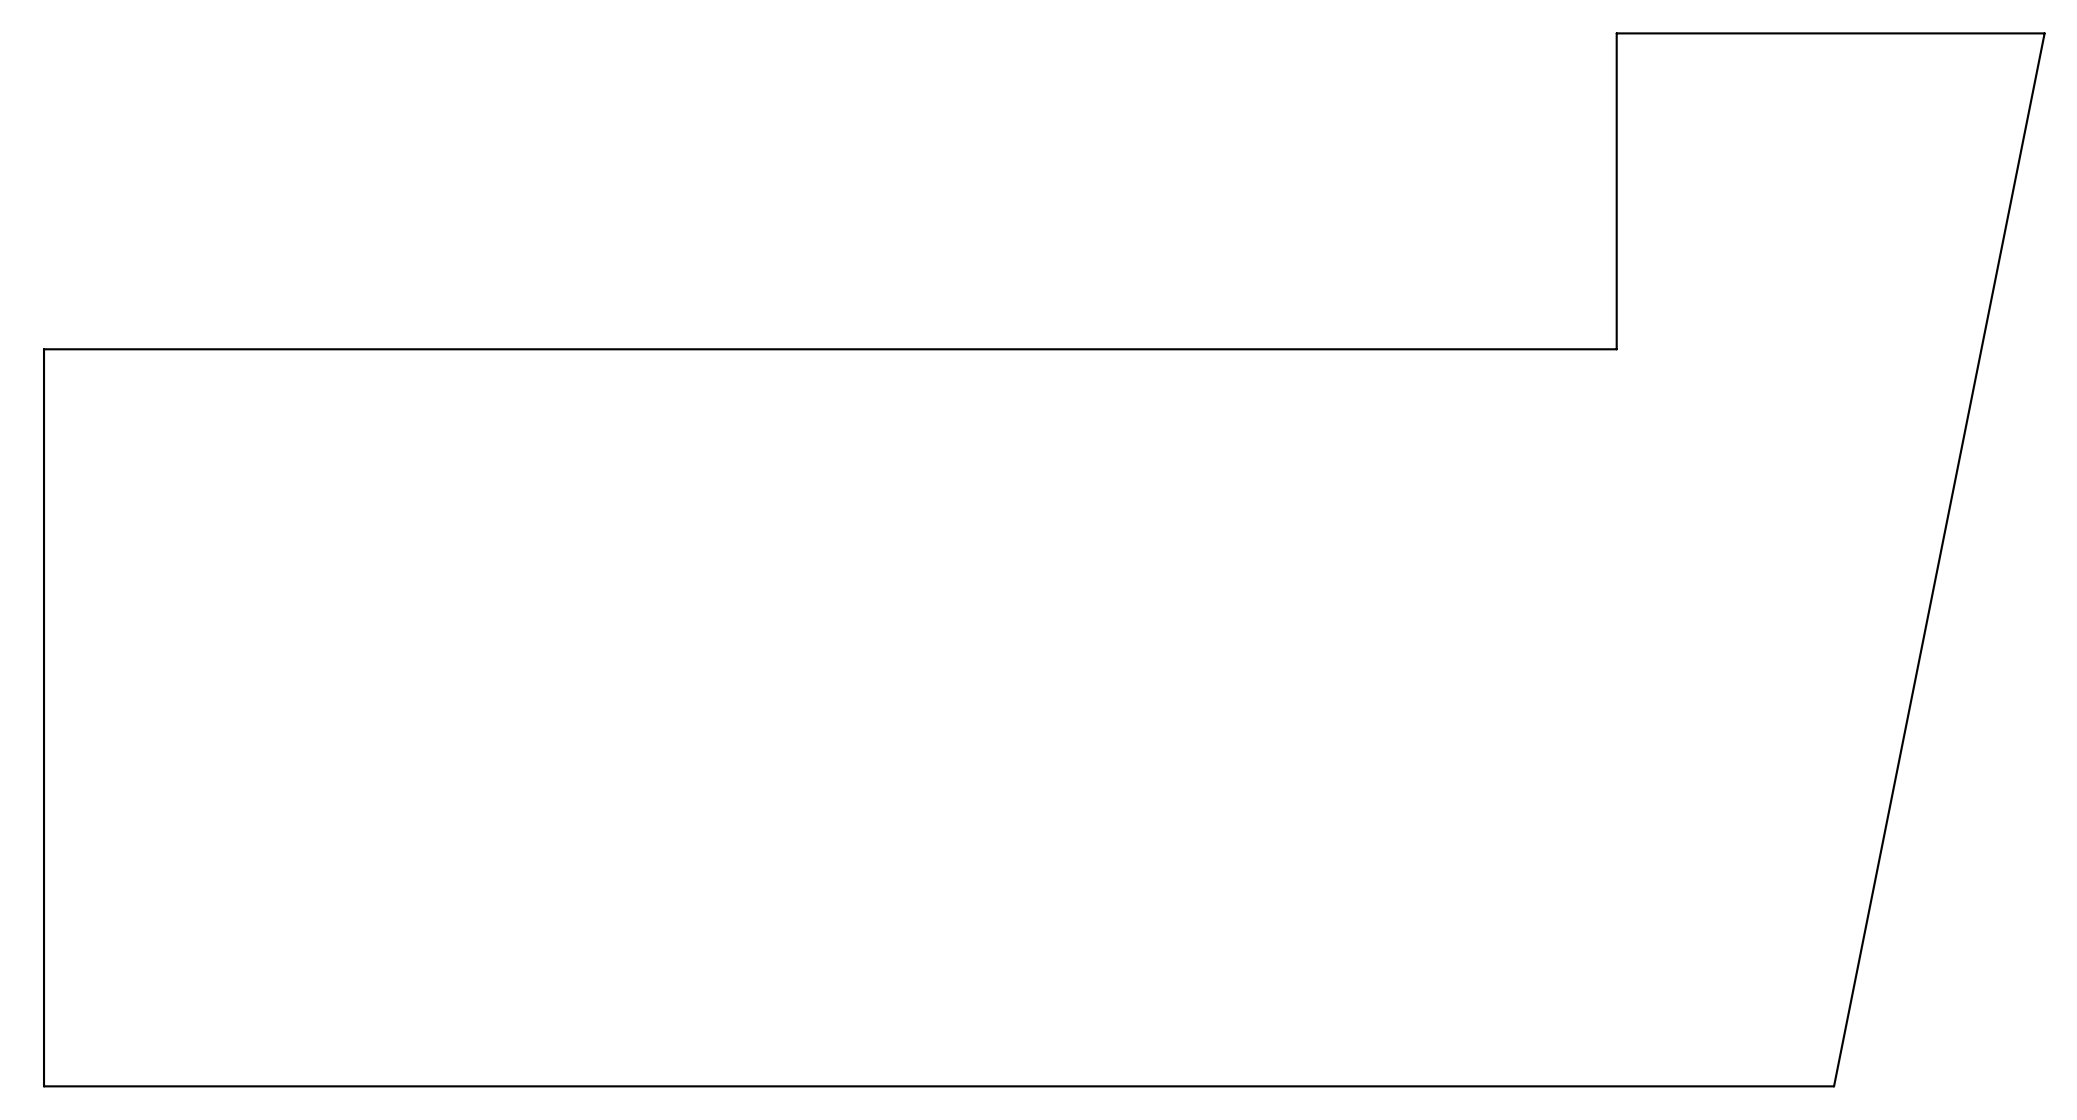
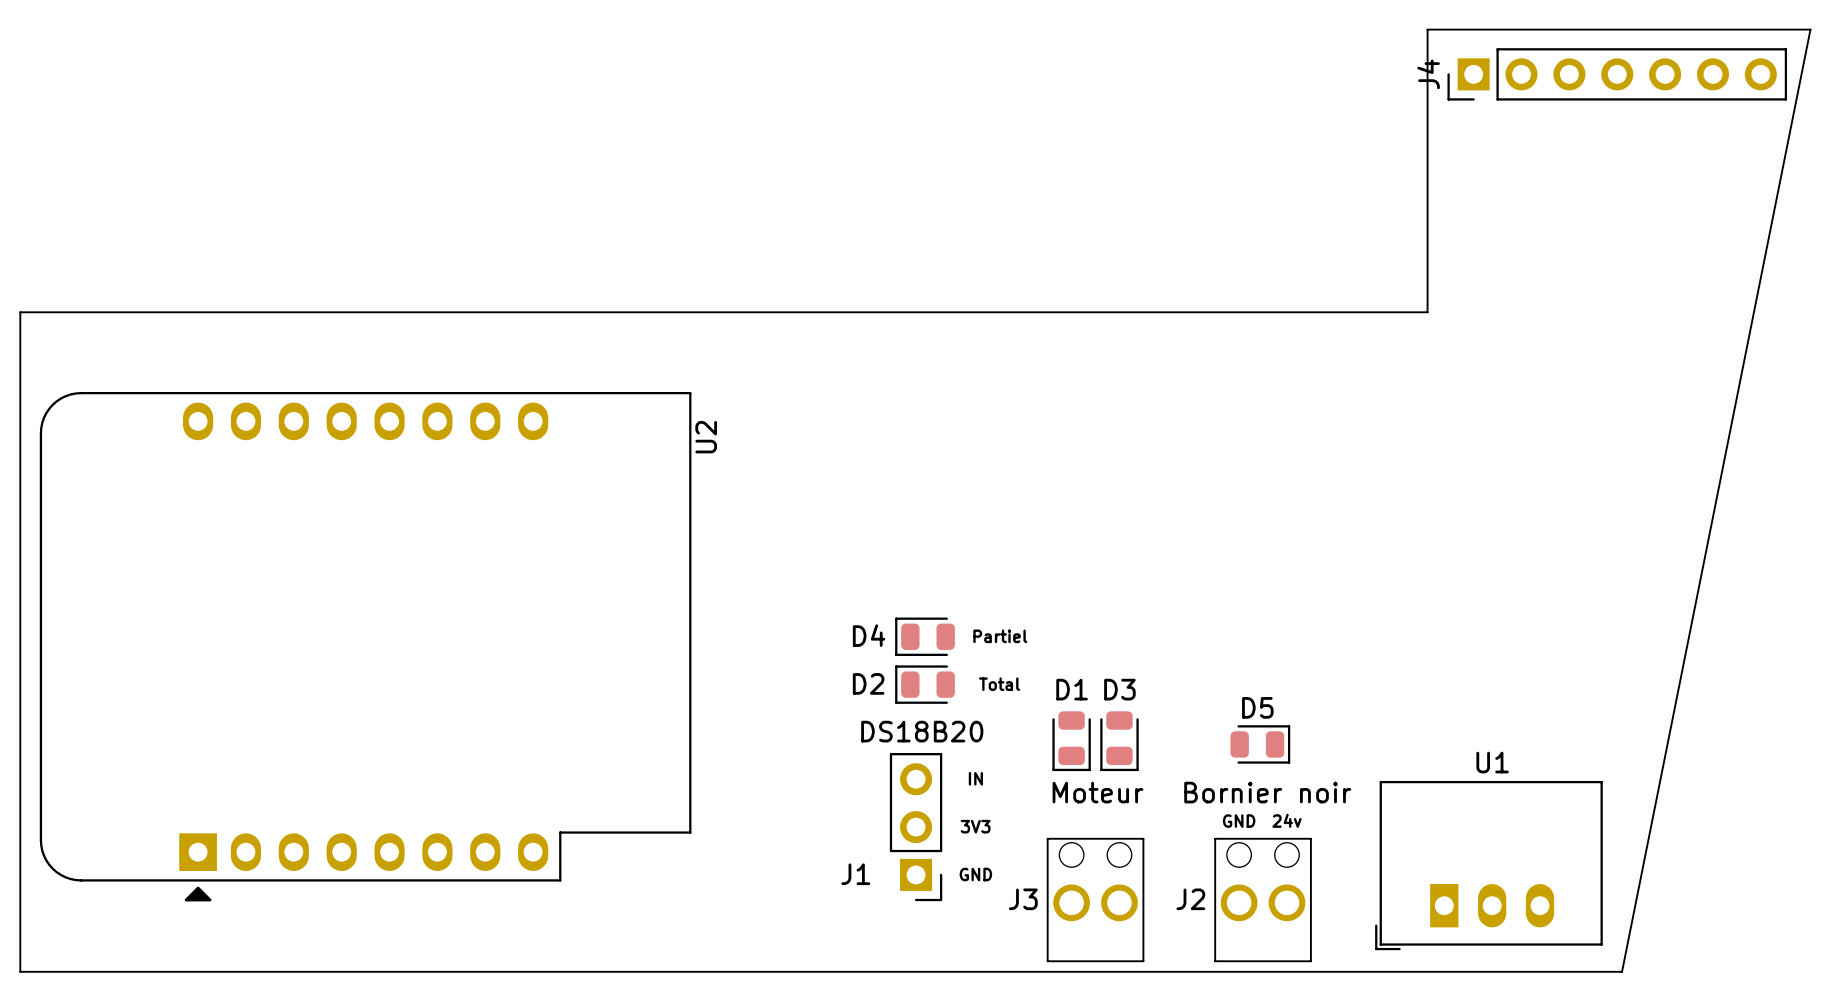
J4: none -> (1617, 74)
D4: none -> (925, 636)
text: none -> Partiel (1000, 636)
U2: none -> (365, 646)
text: none -> Total (999, 684)
D2: none -> (925, 684)
text: none -> DS18B20 (922, 731)
D1: none -> (1071, 741)
D3: none -> (1119, 741)
D5: none -> (1260, 744)
text: none -> IN (975, 778)
text: none -> Moteur (1097, 792)
text: none -> Bornier noir (1267, 792)
text: none -> GND (1239, 821)
text: none -> 24v (1286, 820)
J1: none -> (916, 827)
text: none -> 3V3 (975, 826)
U1: none -> (1488, 865)
text: none -> GND (975, 874)
J3: none -> (1095, 900)
J2: none -> (1263, 900)

